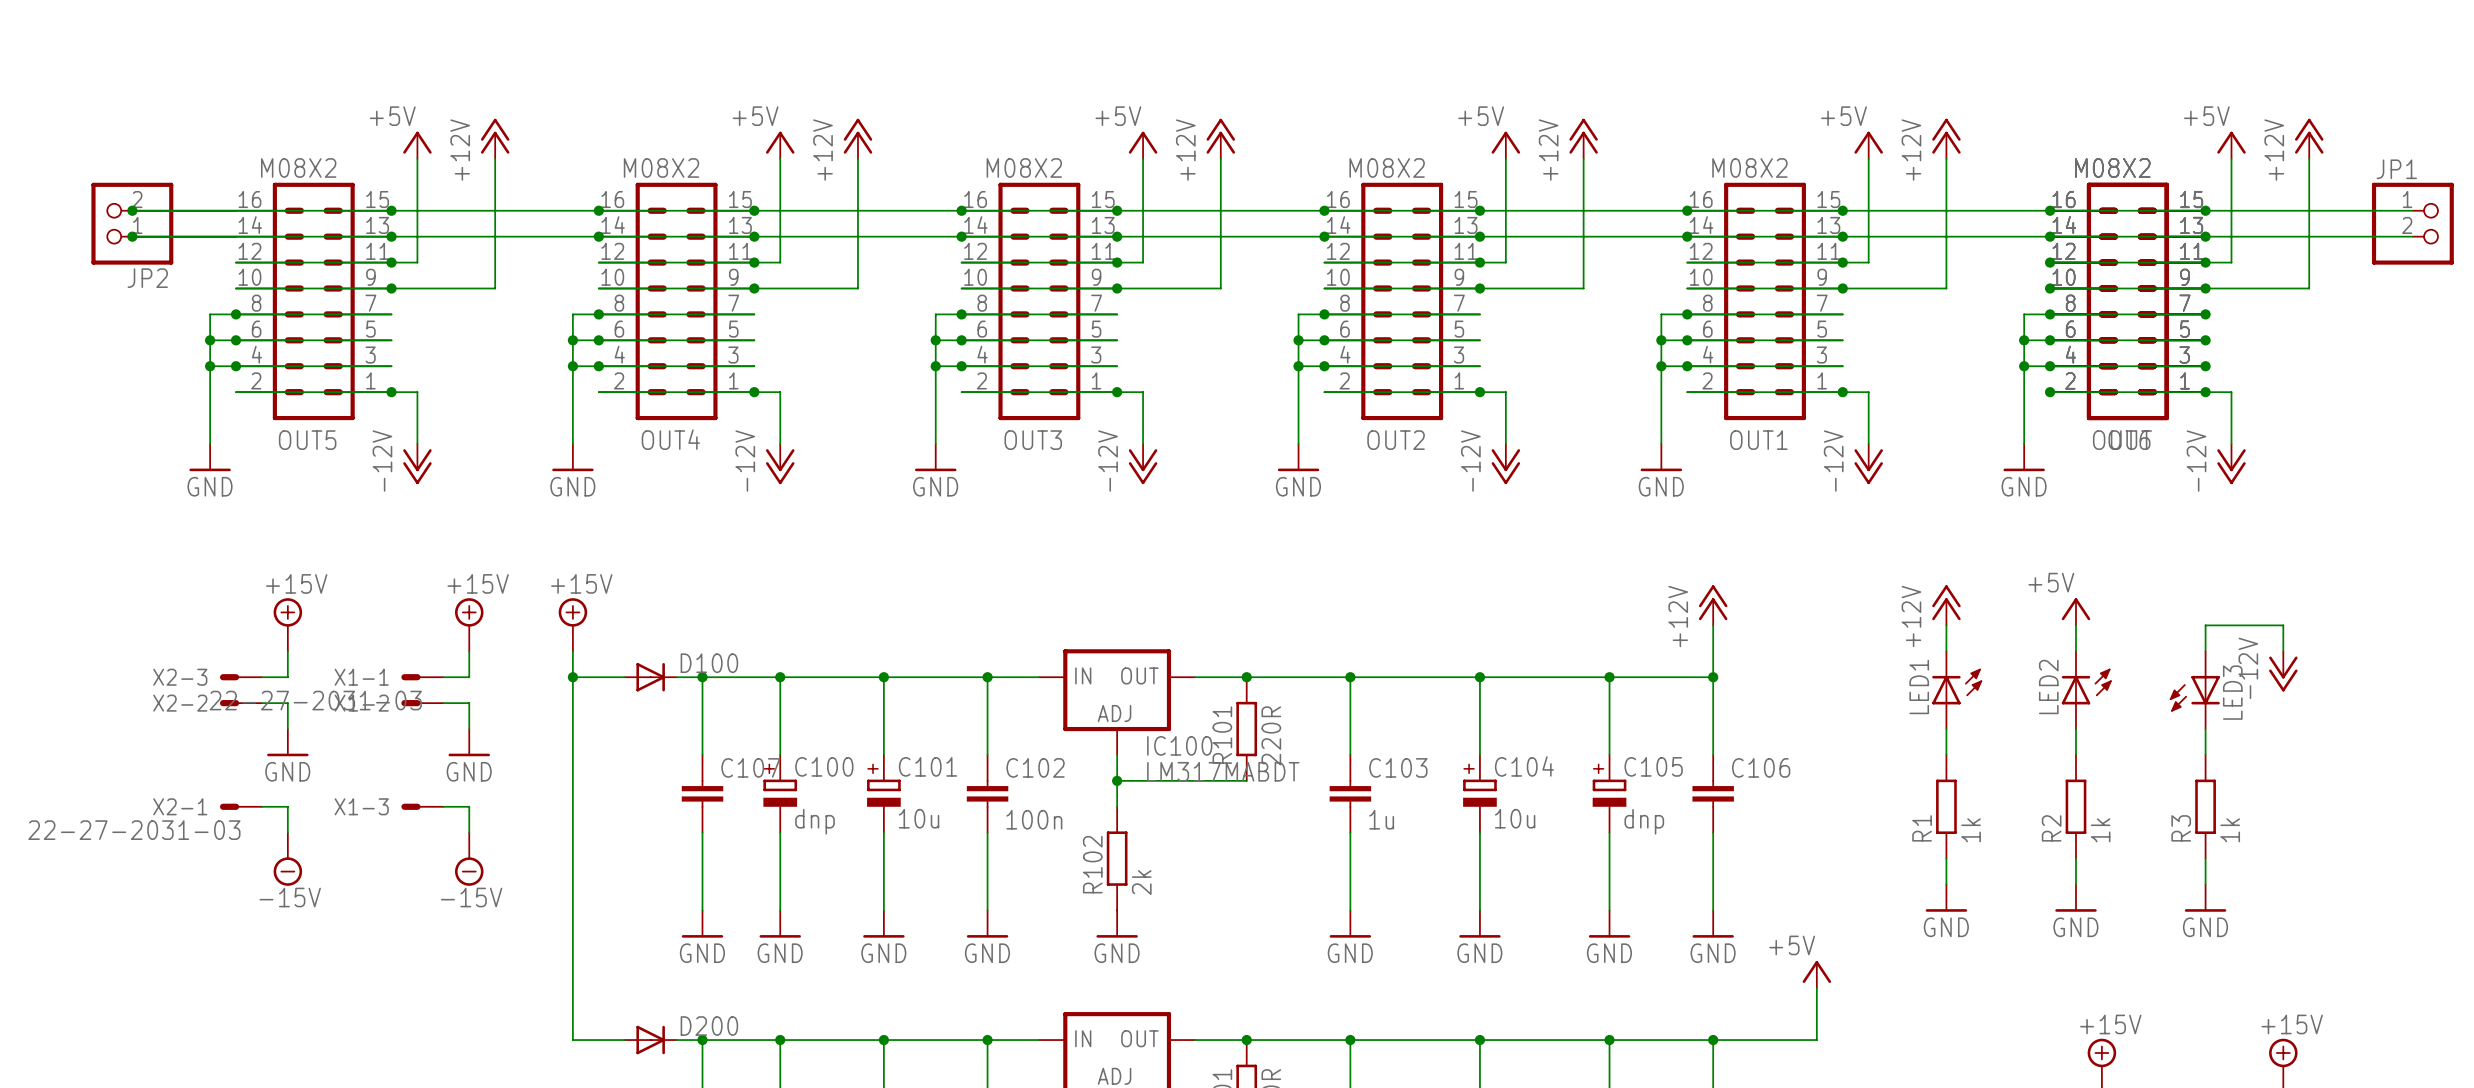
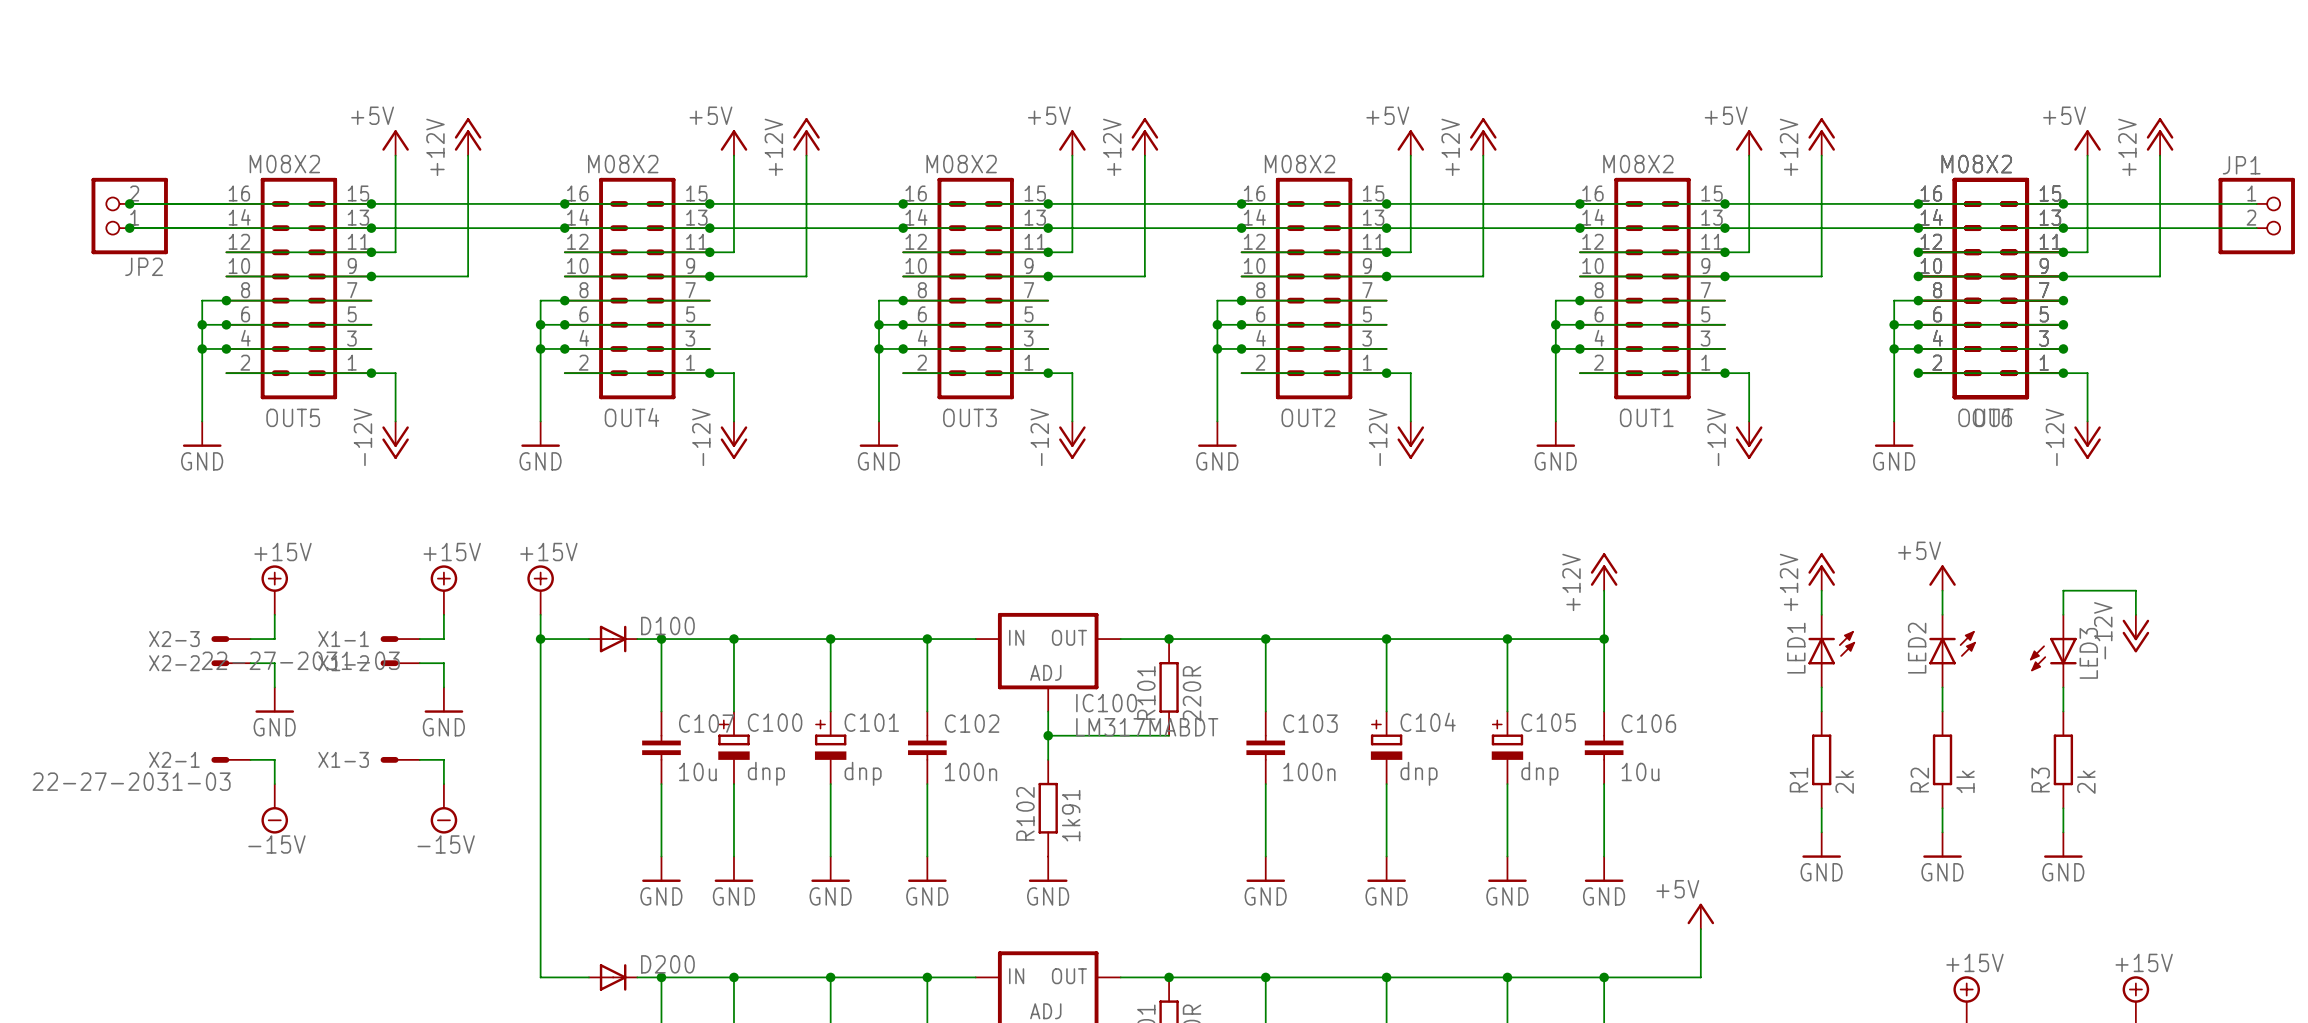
C101 value: 10u (919, 818) -> dnp (863, 773)
C104 value: 10u (1515, 818) -> dnp (1419, 773)
C107 value: none -> 10u (697, 771)
C103 value: 1u (1381, 819) -> 100n (1309, 771)
C106 value: none -> 10u (1640, 771)
R1 value: 1k (1971, 830) -> 2k (1844, 782)
R3 value: 1k (2230, 830) -> 2k (2086, 782)
R102 value: 2k (1141, 882) -> 1k91 (1071, 815)

